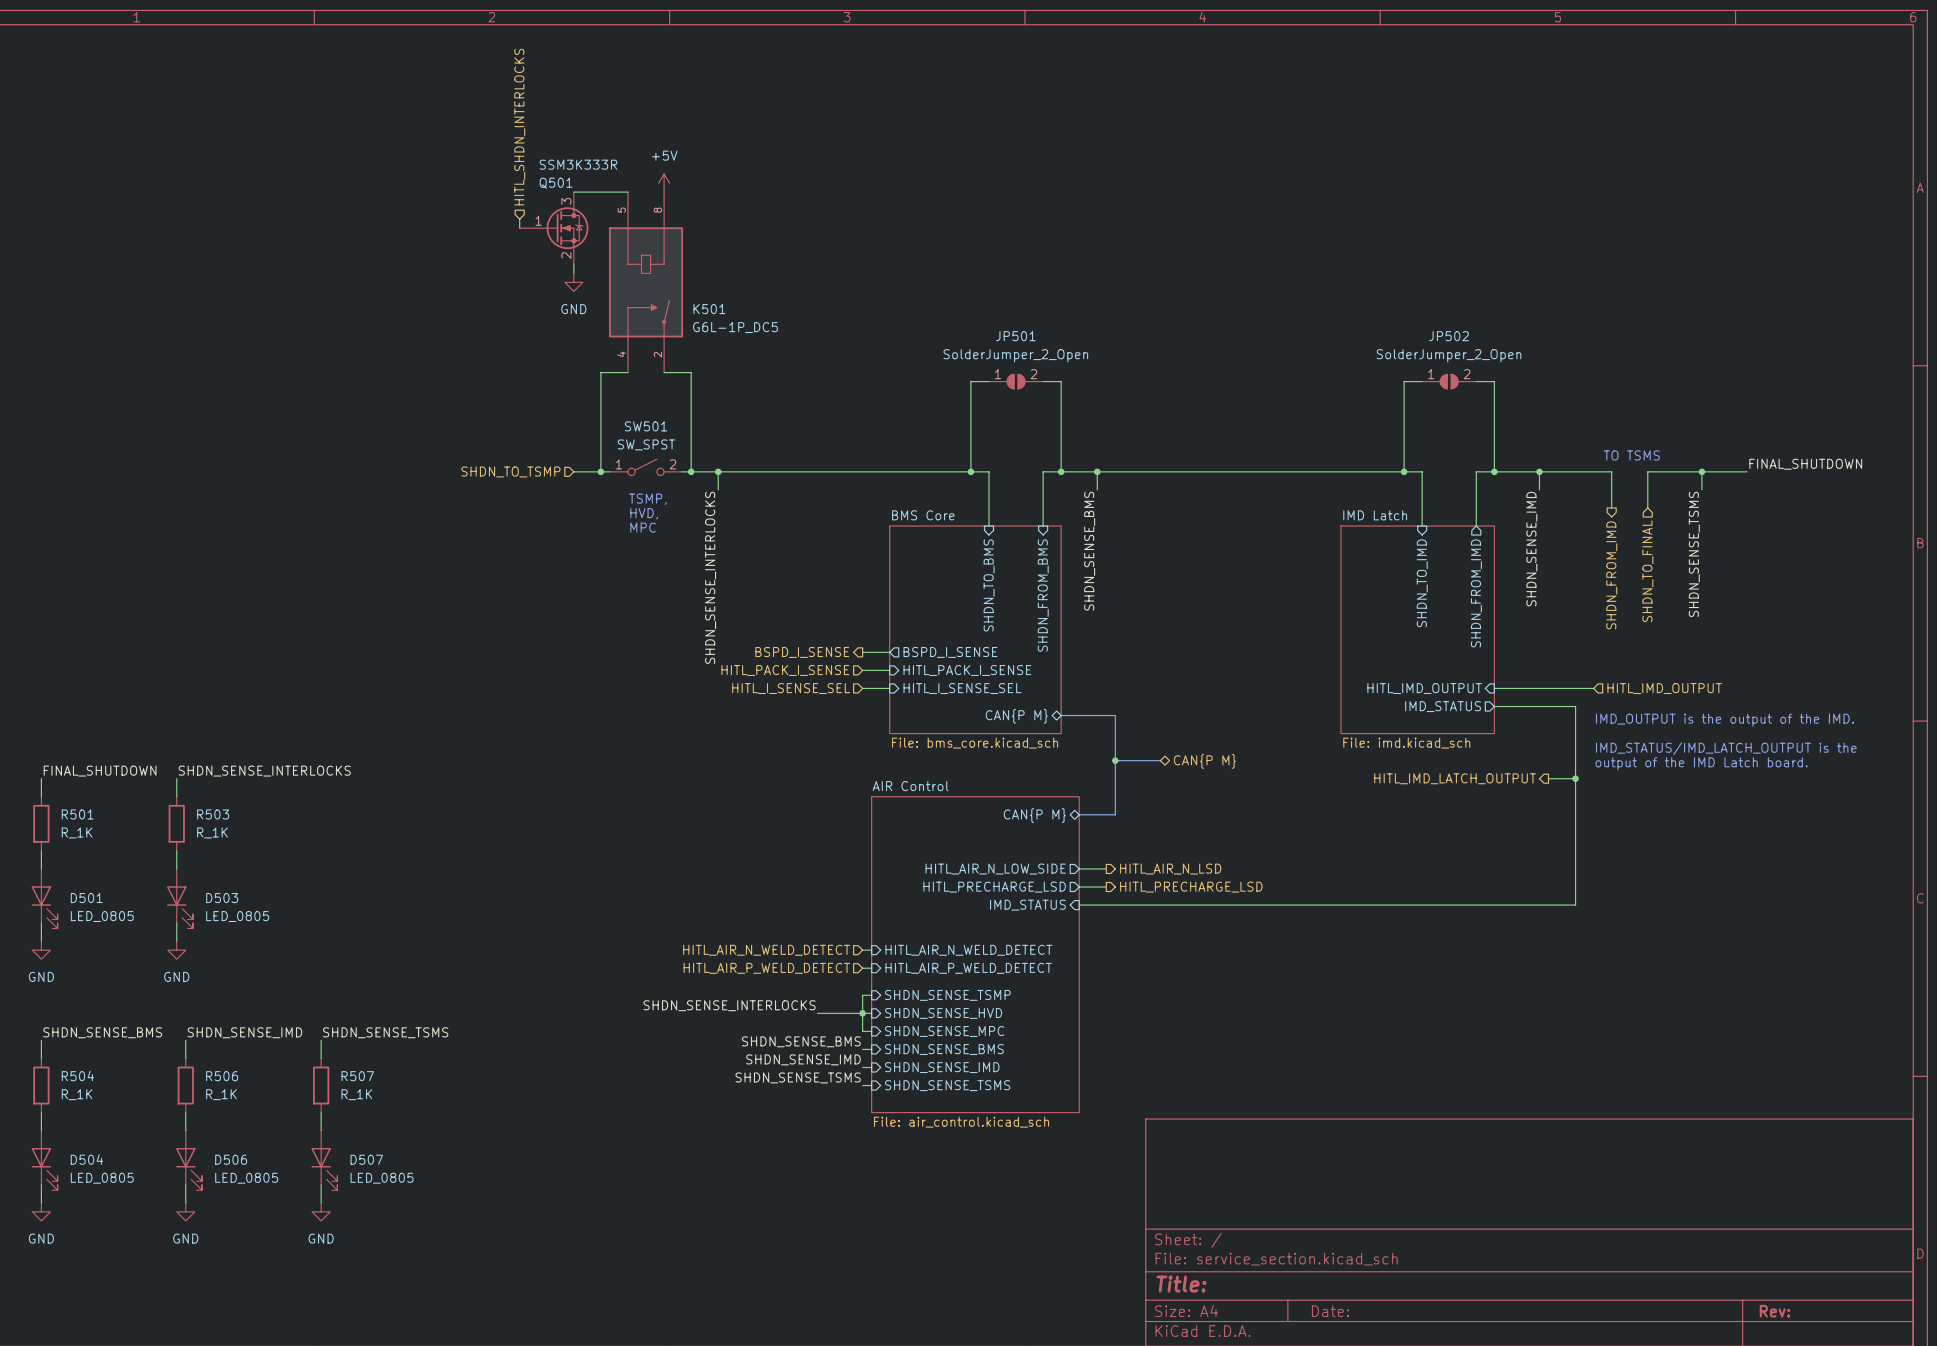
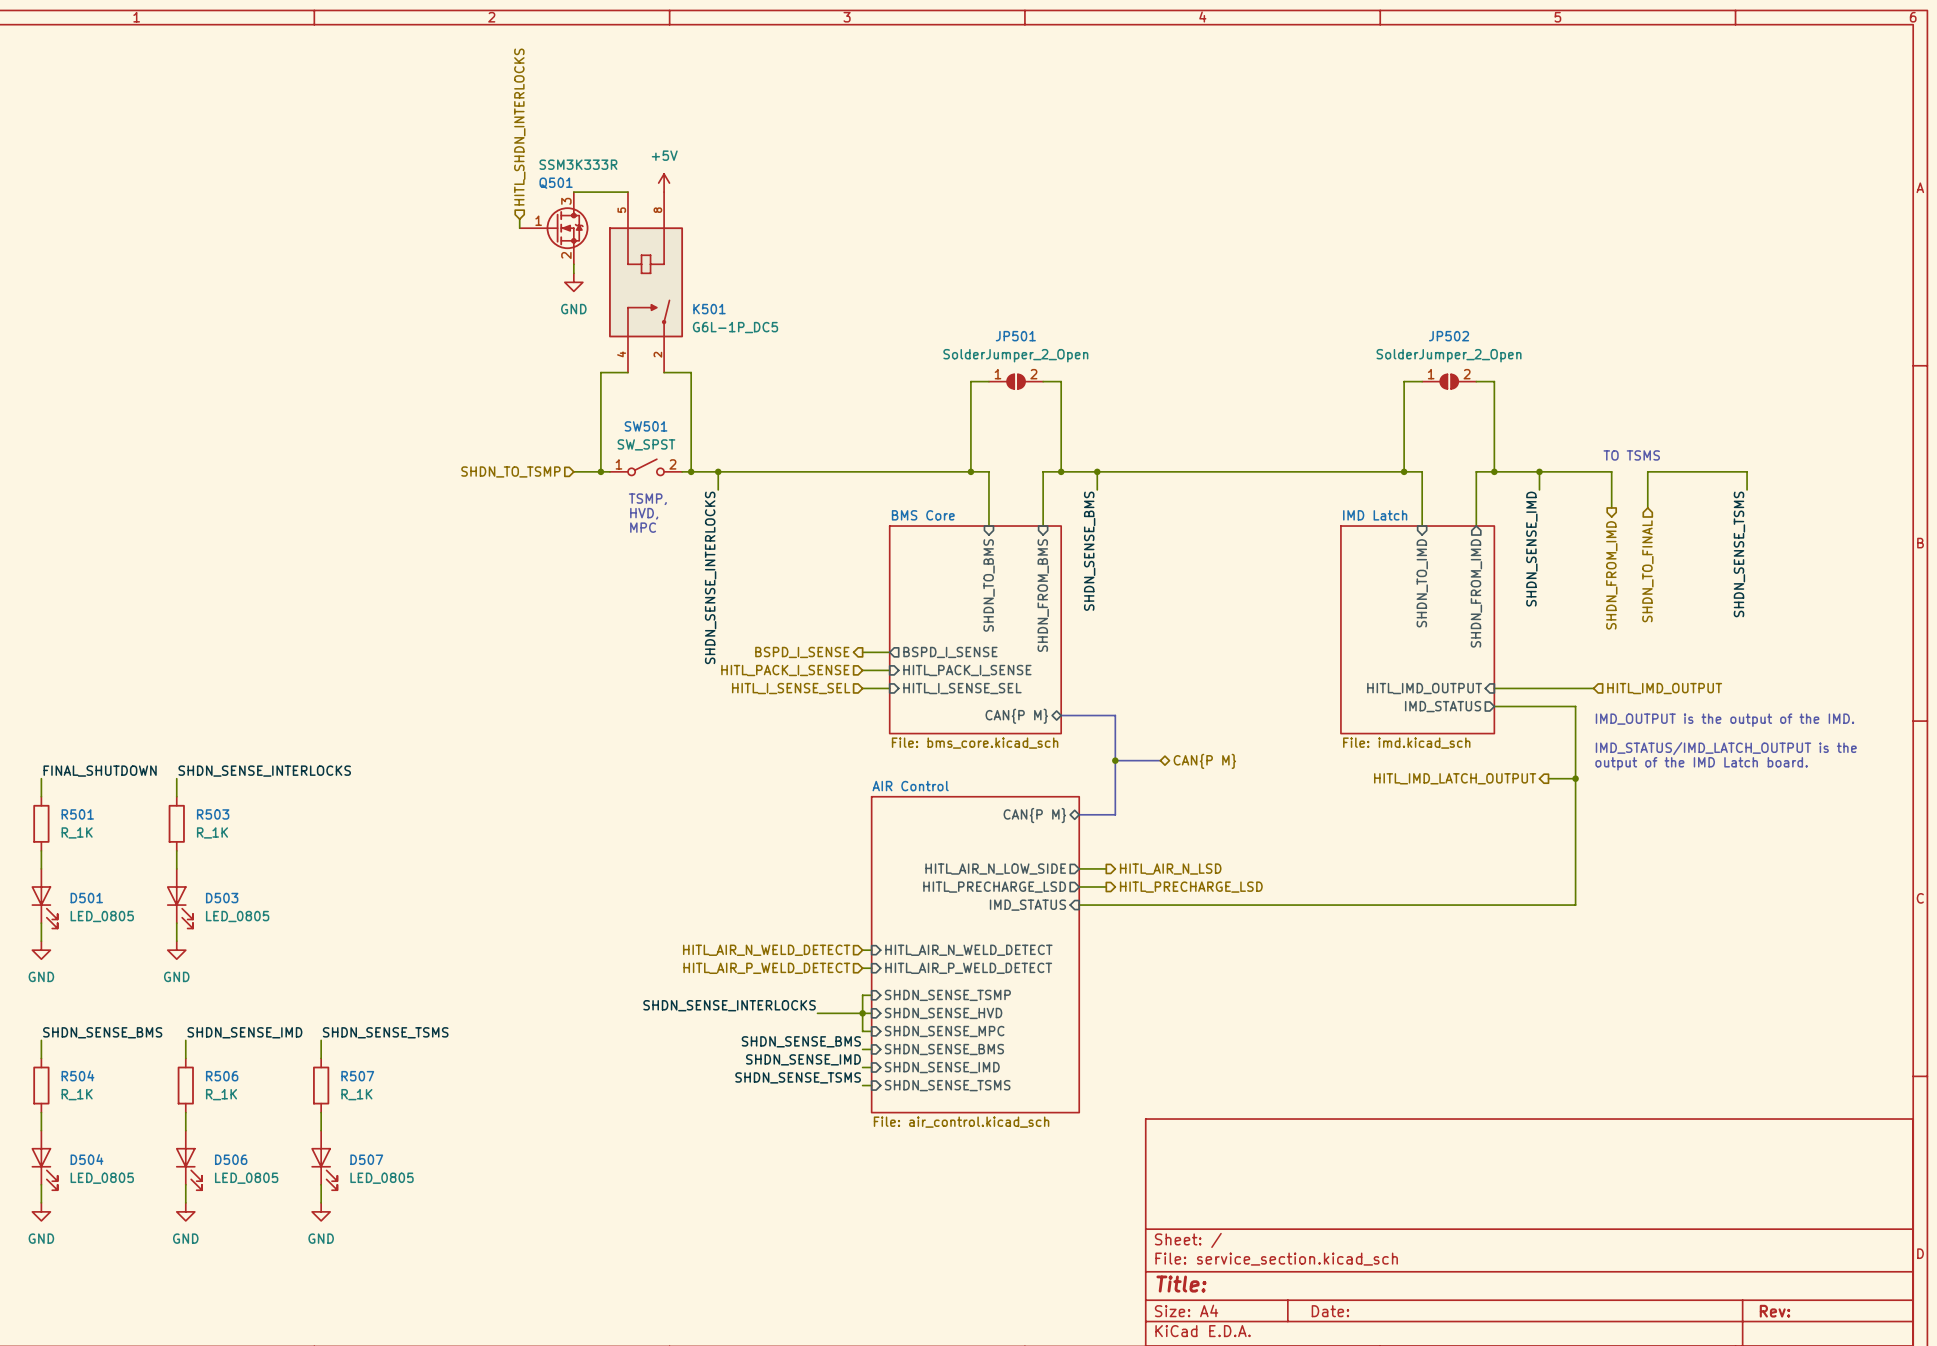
label: FINAL_SHUTDOWN (1805, 464) -> none
wire: (1701, 471) (1701, 489) -> (1747, 471) (1747, 489)
junction: (1701, 471) -> none
label position: SHDN_SENSE_TSMS (1694, 554) -> SHDN_SENSE_TSMS (1739, 554)

